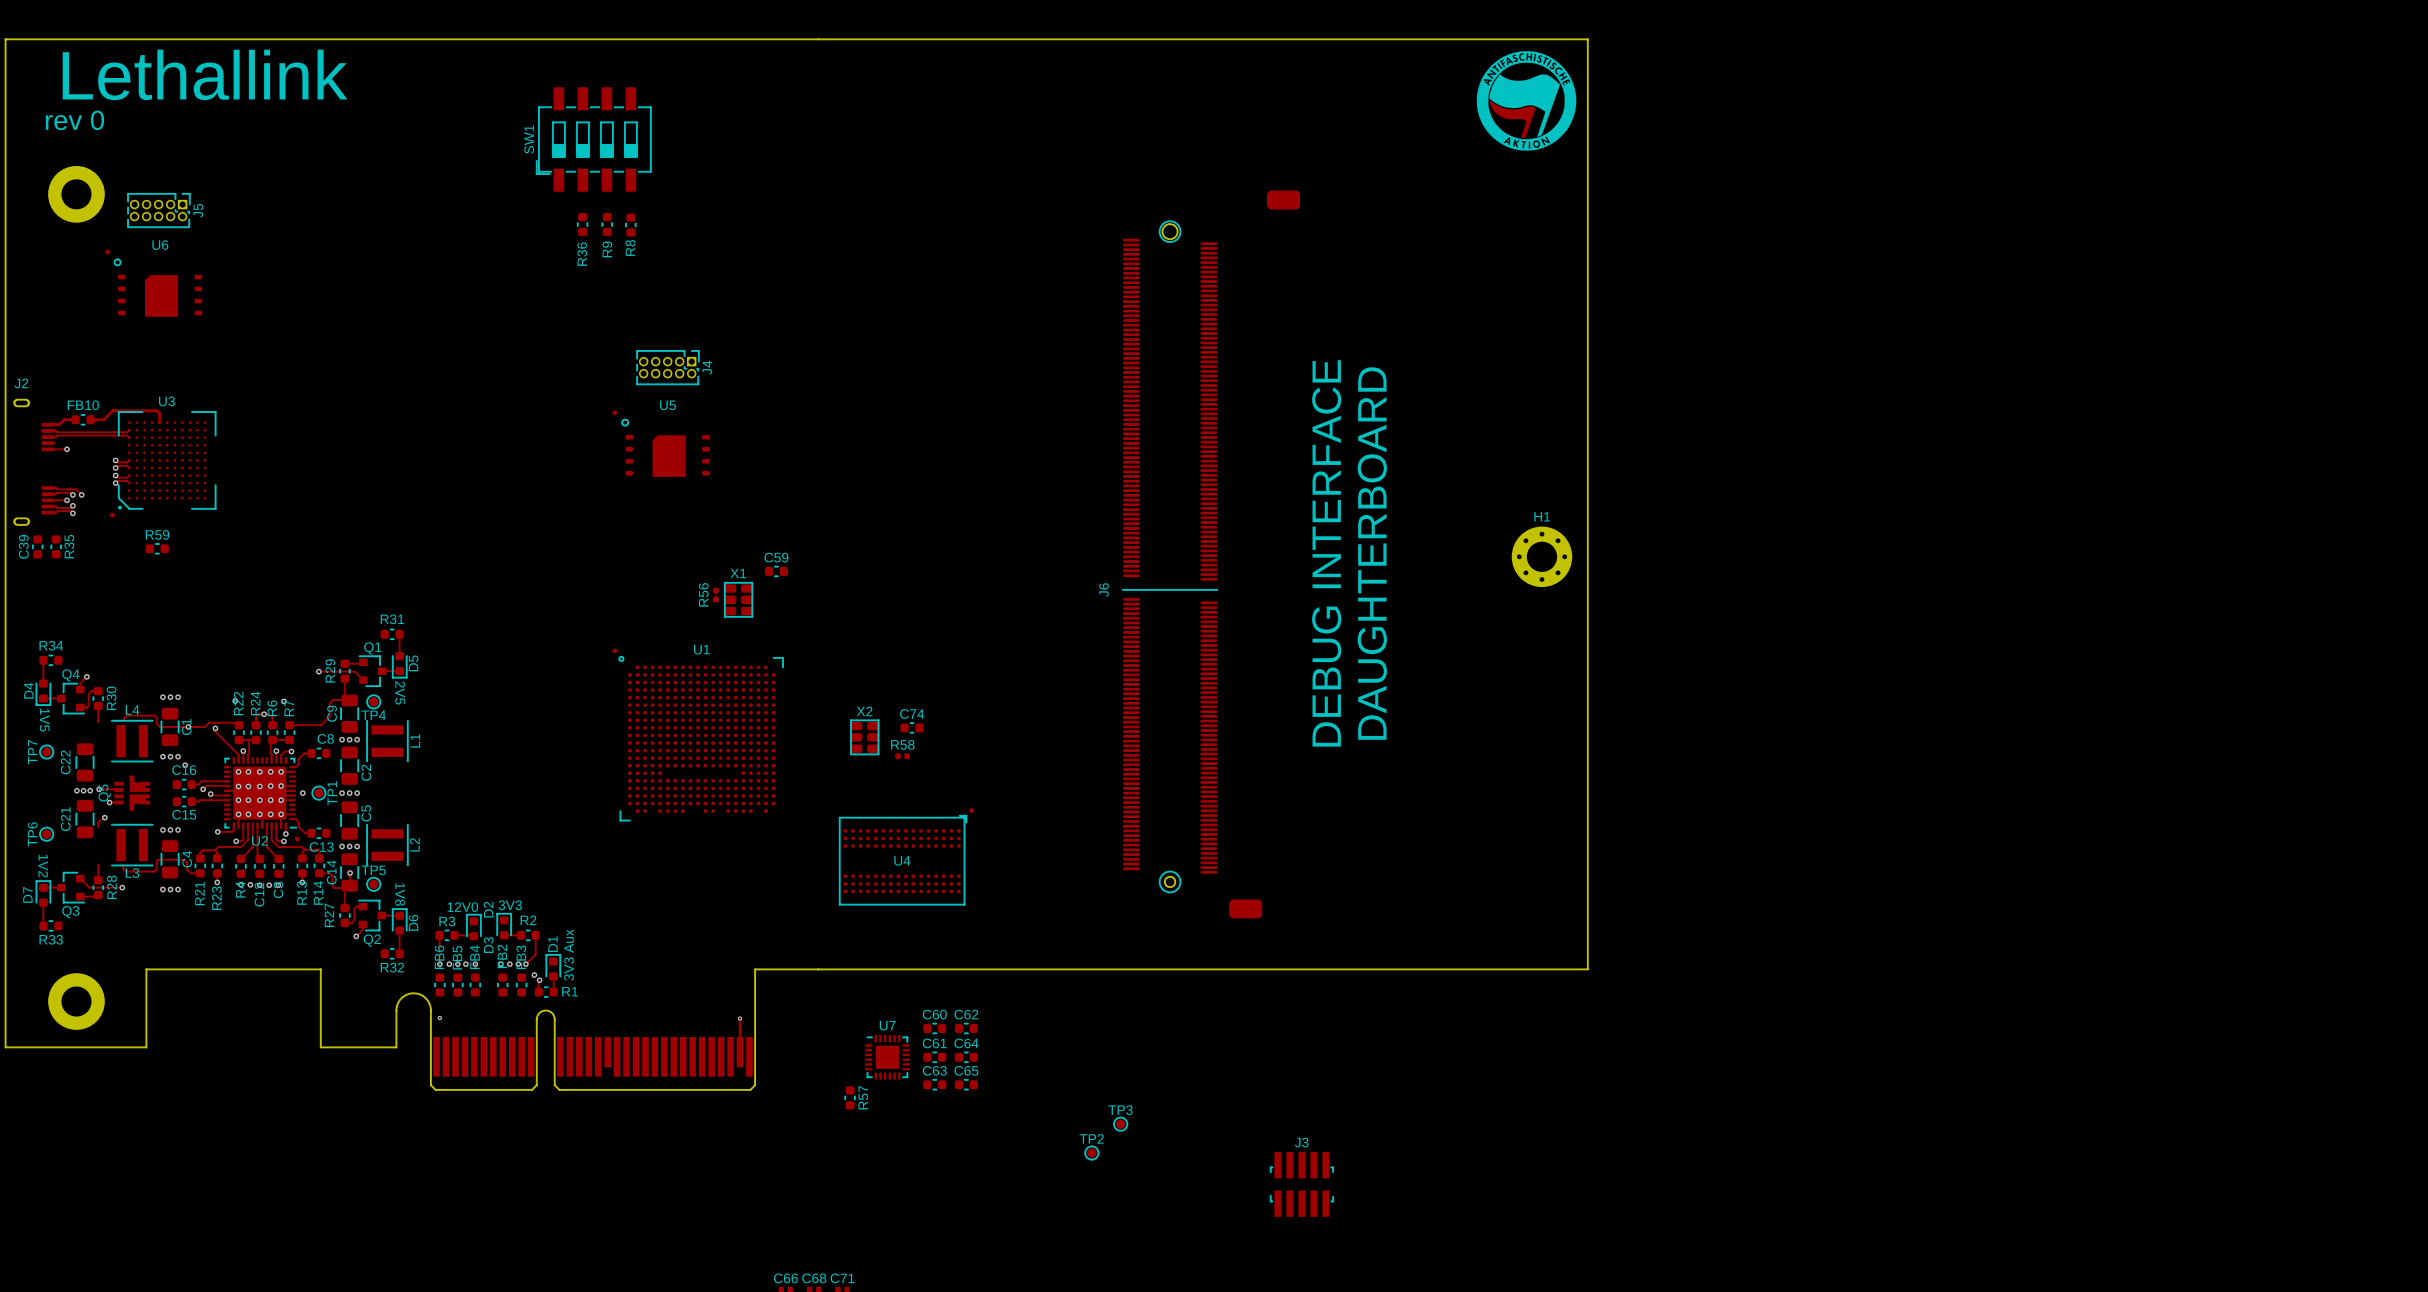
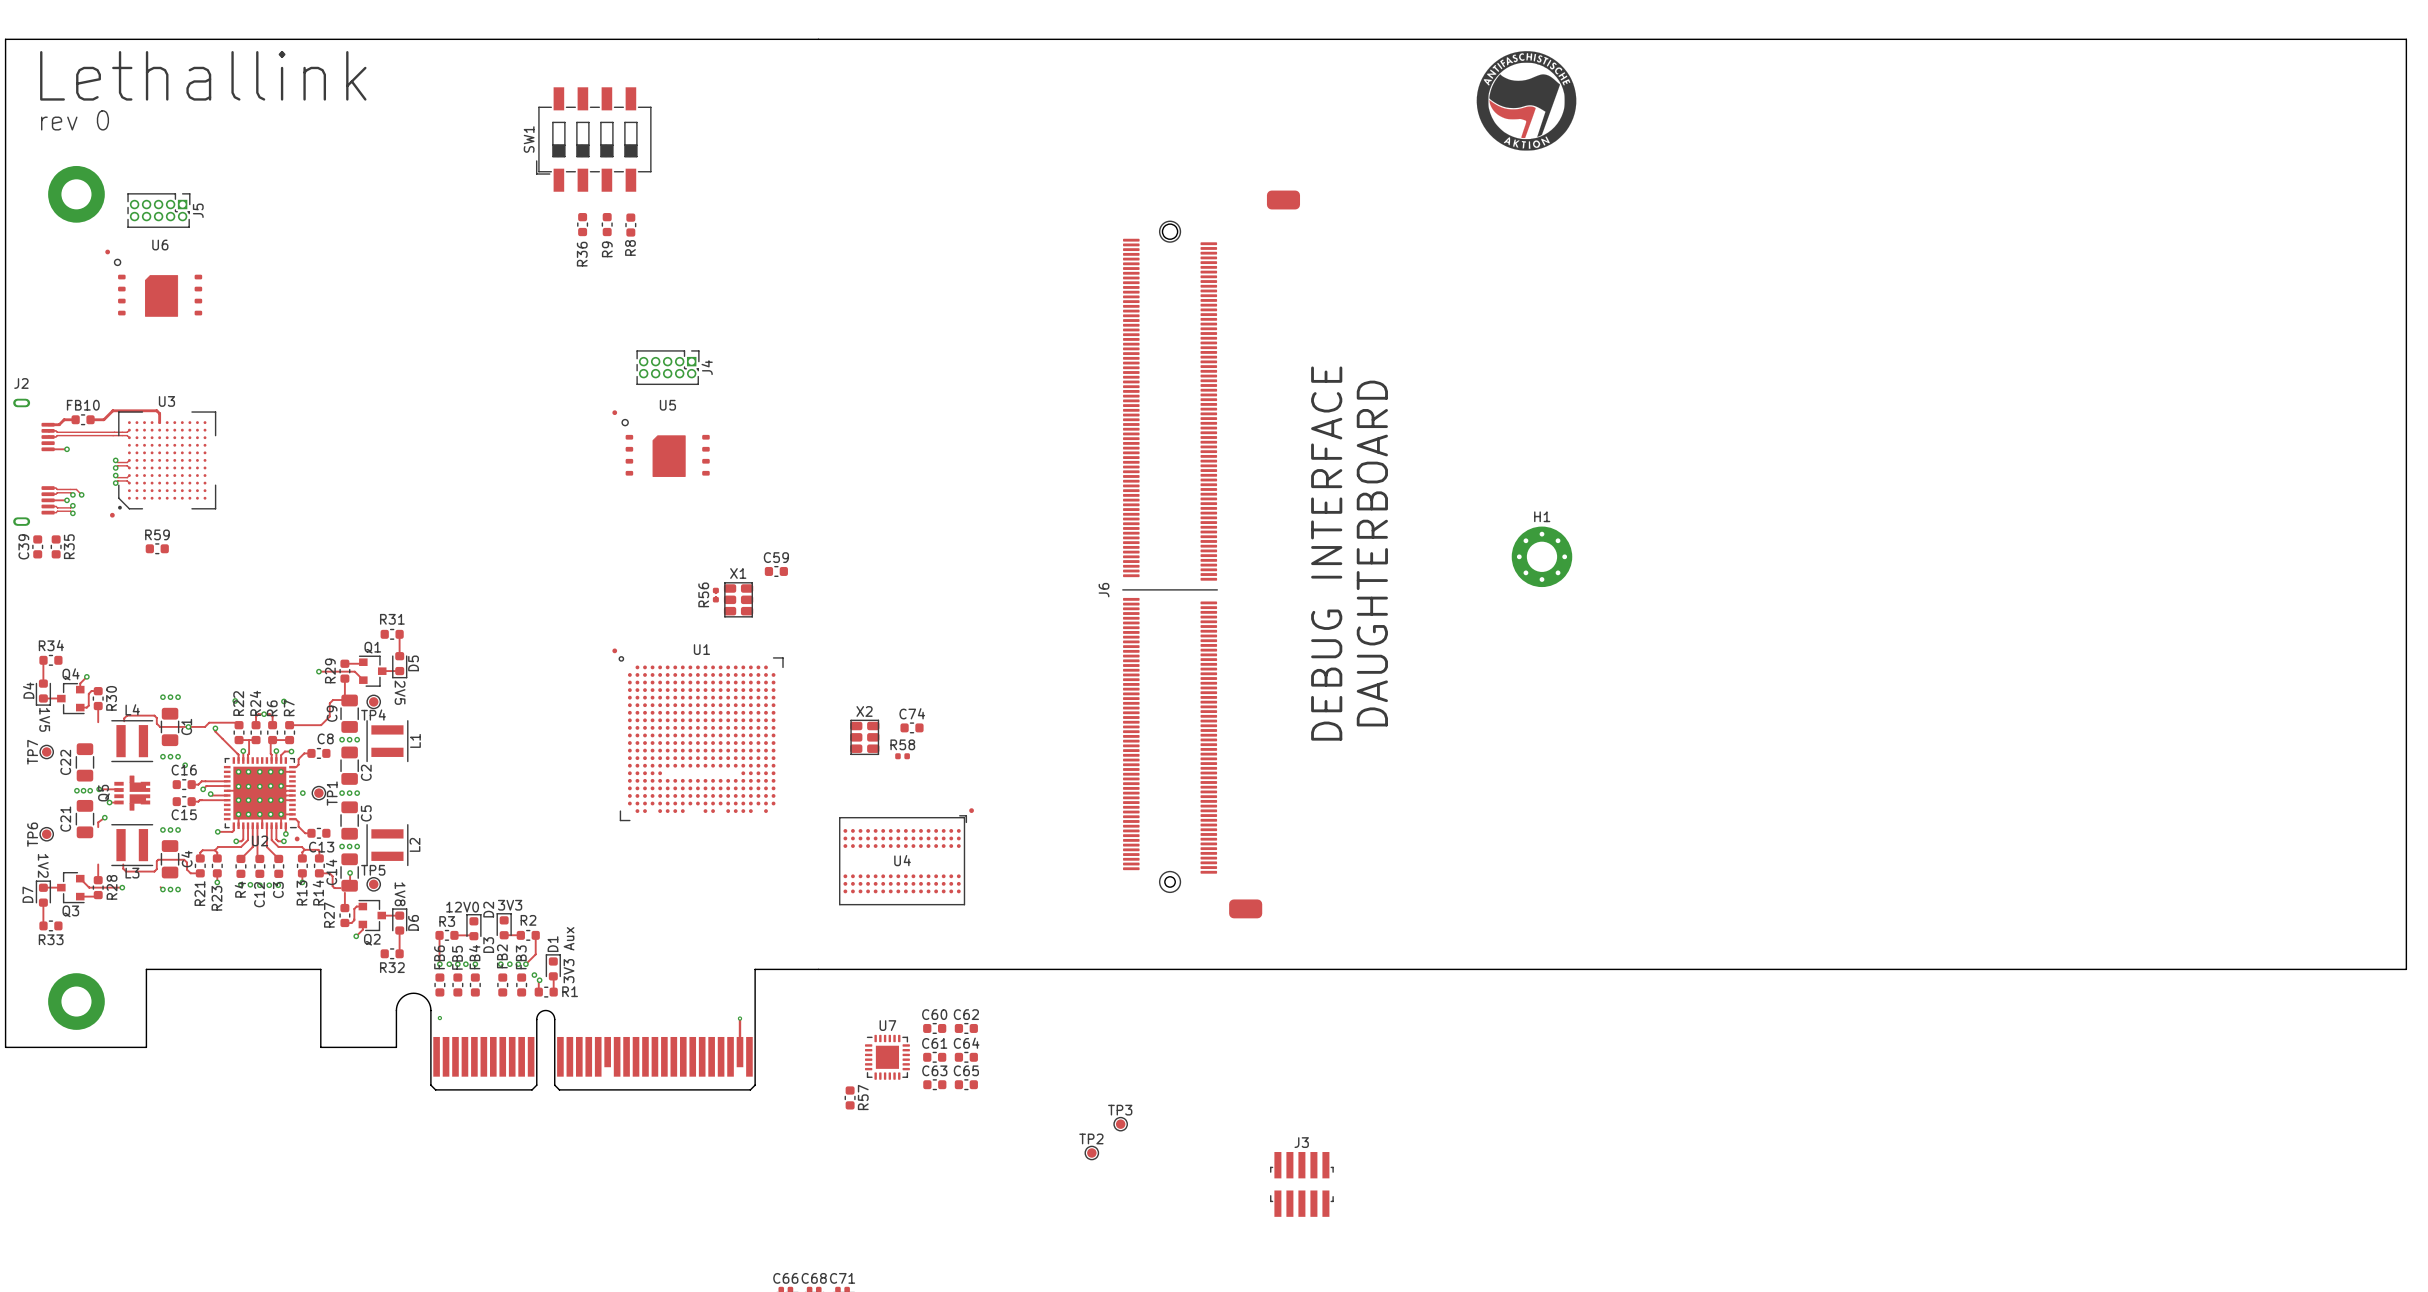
board edge: (1587, 39) (1587, 969) -> (1587, 39) (2406, 39) (2406, 969) (1587, 969)

